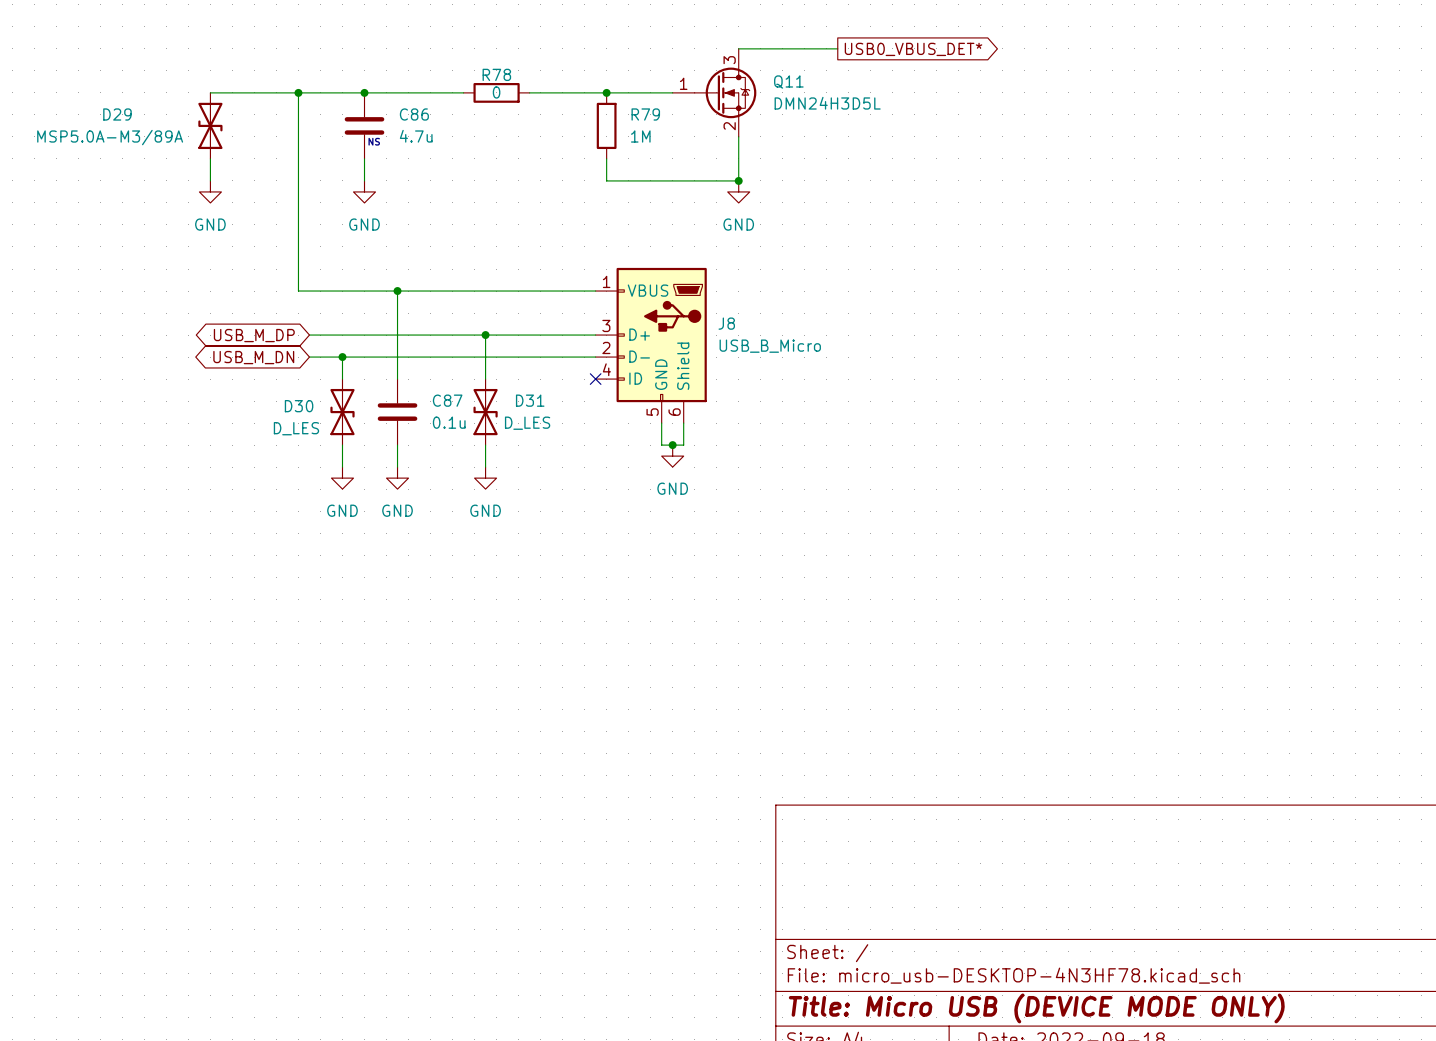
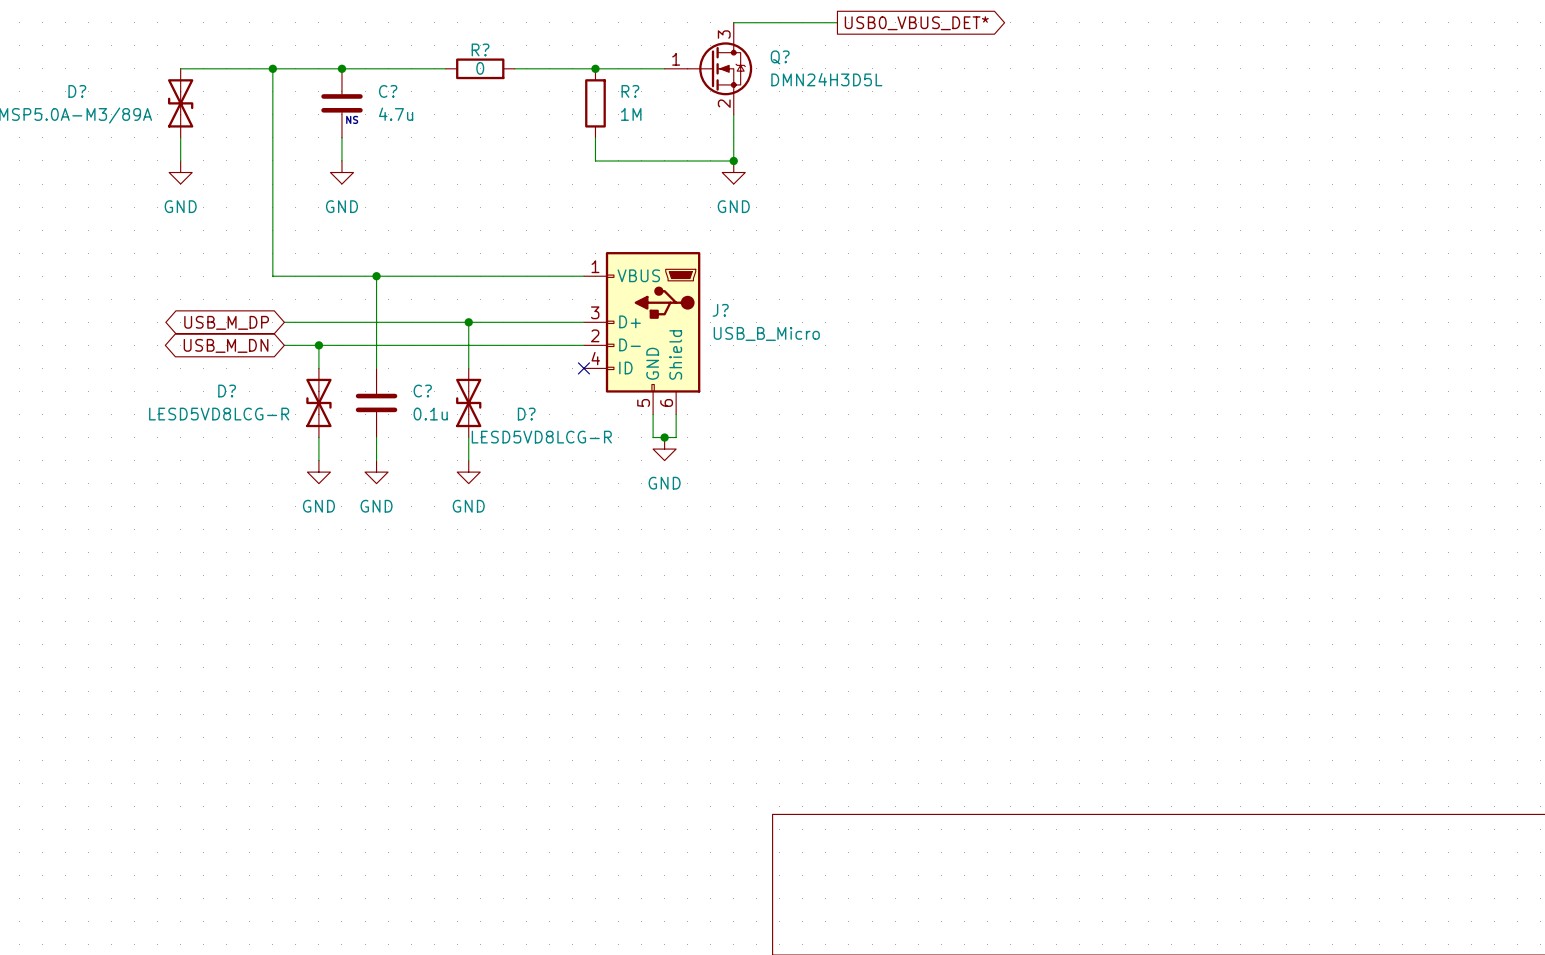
R78 name: R78 (496, 74) -> R? (480, 49)
Q11 name: Q11 (788, 82) -> Q? (780, 57)
D29 name: D29 (117, 114) -> D? (77, 91)
C86 name: C86 (414, 114) -> C? (388, 91)
R79 name: R79 (645, 114) -> R? (630, 91)
J8 name: J8 (726, 323) -> J? (720, 310)
C87 name: C87 (447, 400) -> C? (422, 391)
D31 name: D31 (530, 400) -> D? (526, 414)
D30 name: D30 (299, 406) -> D? (227, 391)
D31 value: D_LES (527, 423) -> LESD5VD8LCG-R (541, 437)
D30 value: D_LES (296, 428) -> LESD5VD8LCG-R (219, 414)

